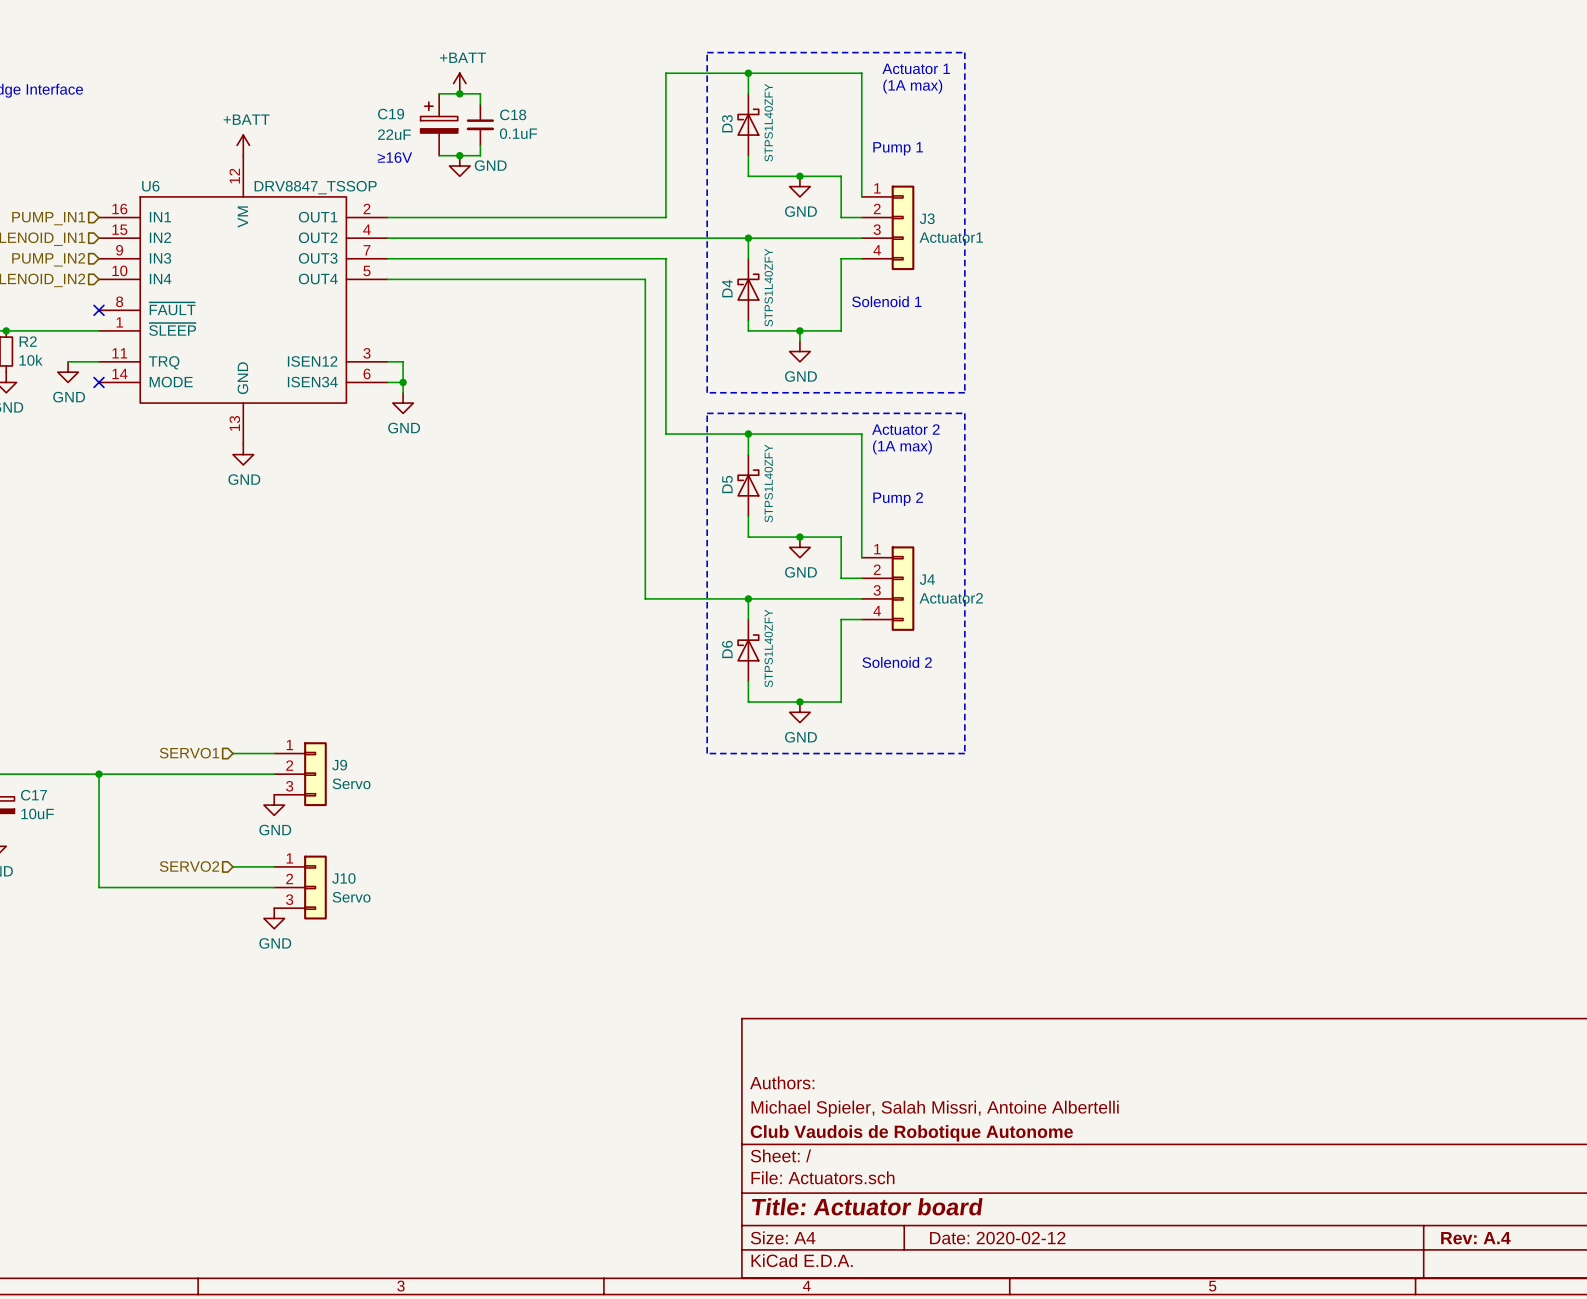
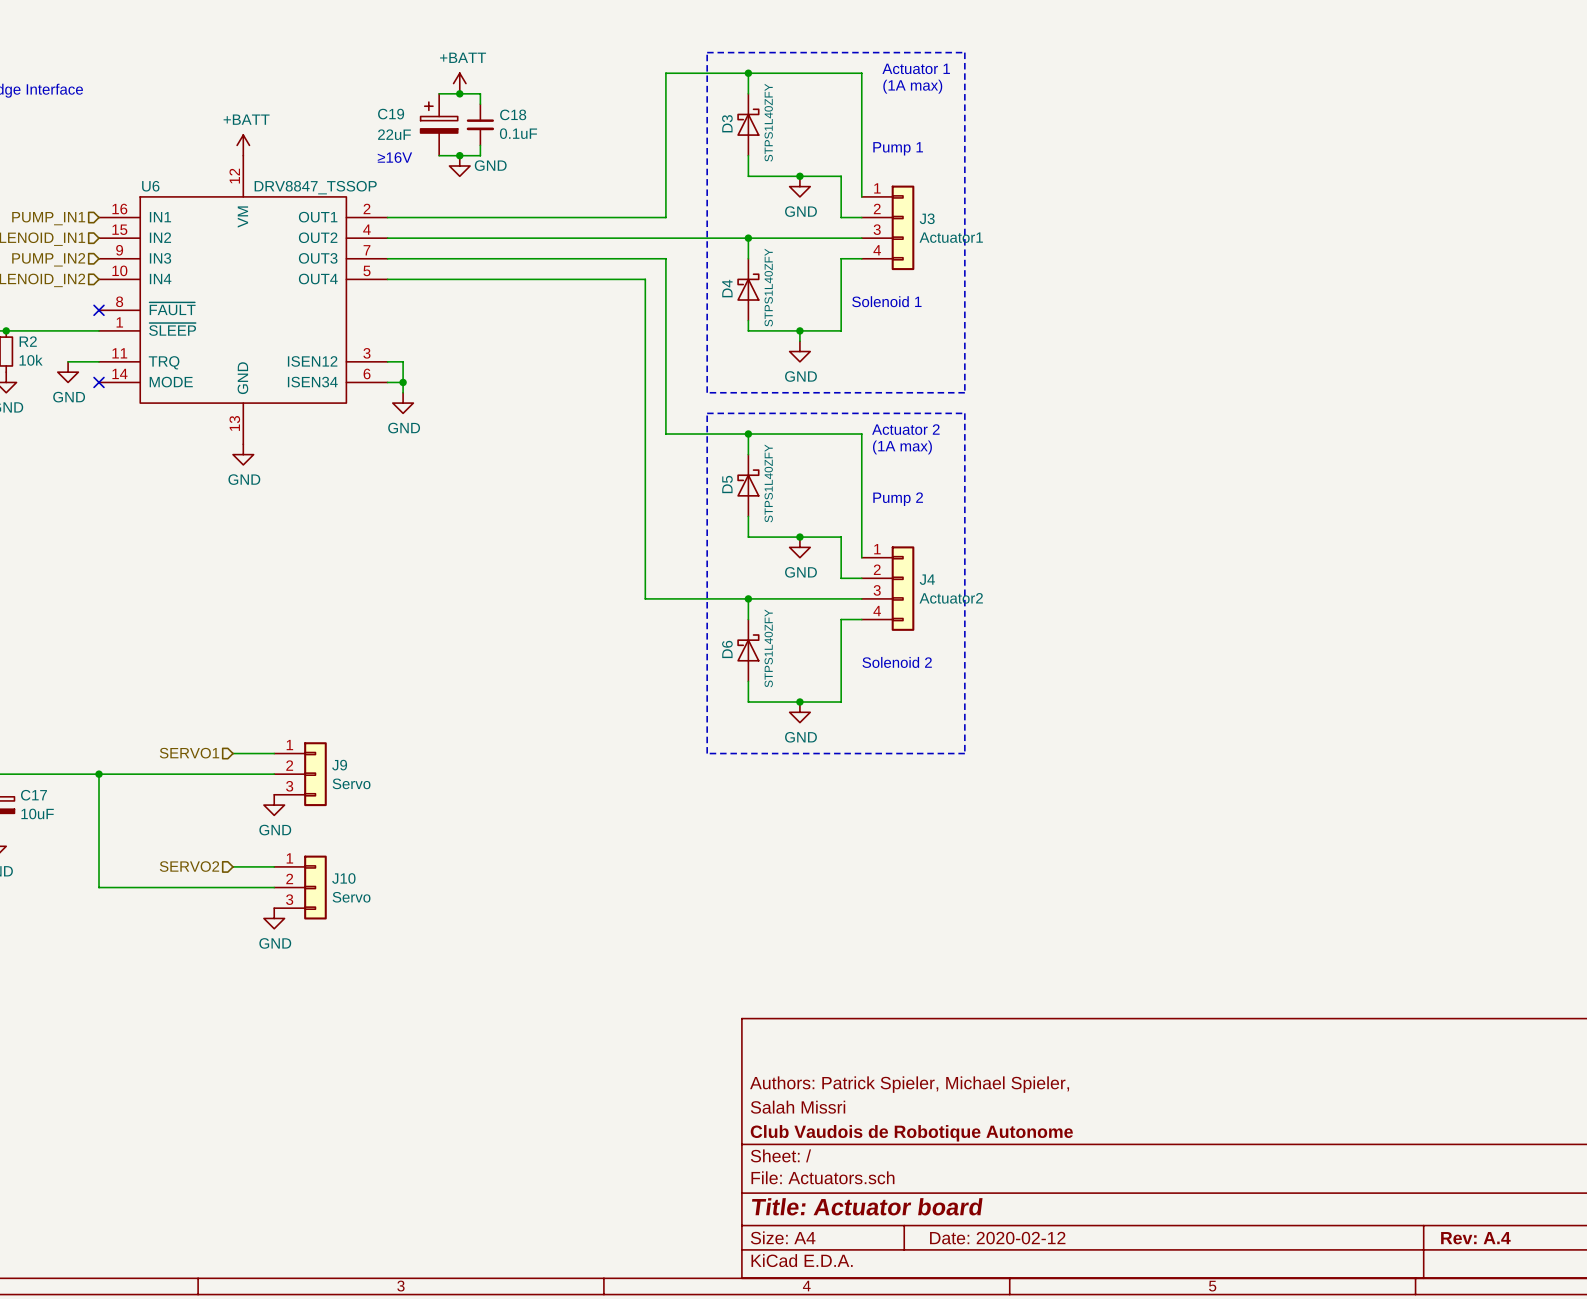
title block: Authors: (782, 1082) -> Authors: Patrick Spieler, Michael Spieler, (909, 1084)
title block: Michael Spieler, Salah Missri, Antoine Albertelli (935, 1108) -> Salah Missri (798, 1107)

